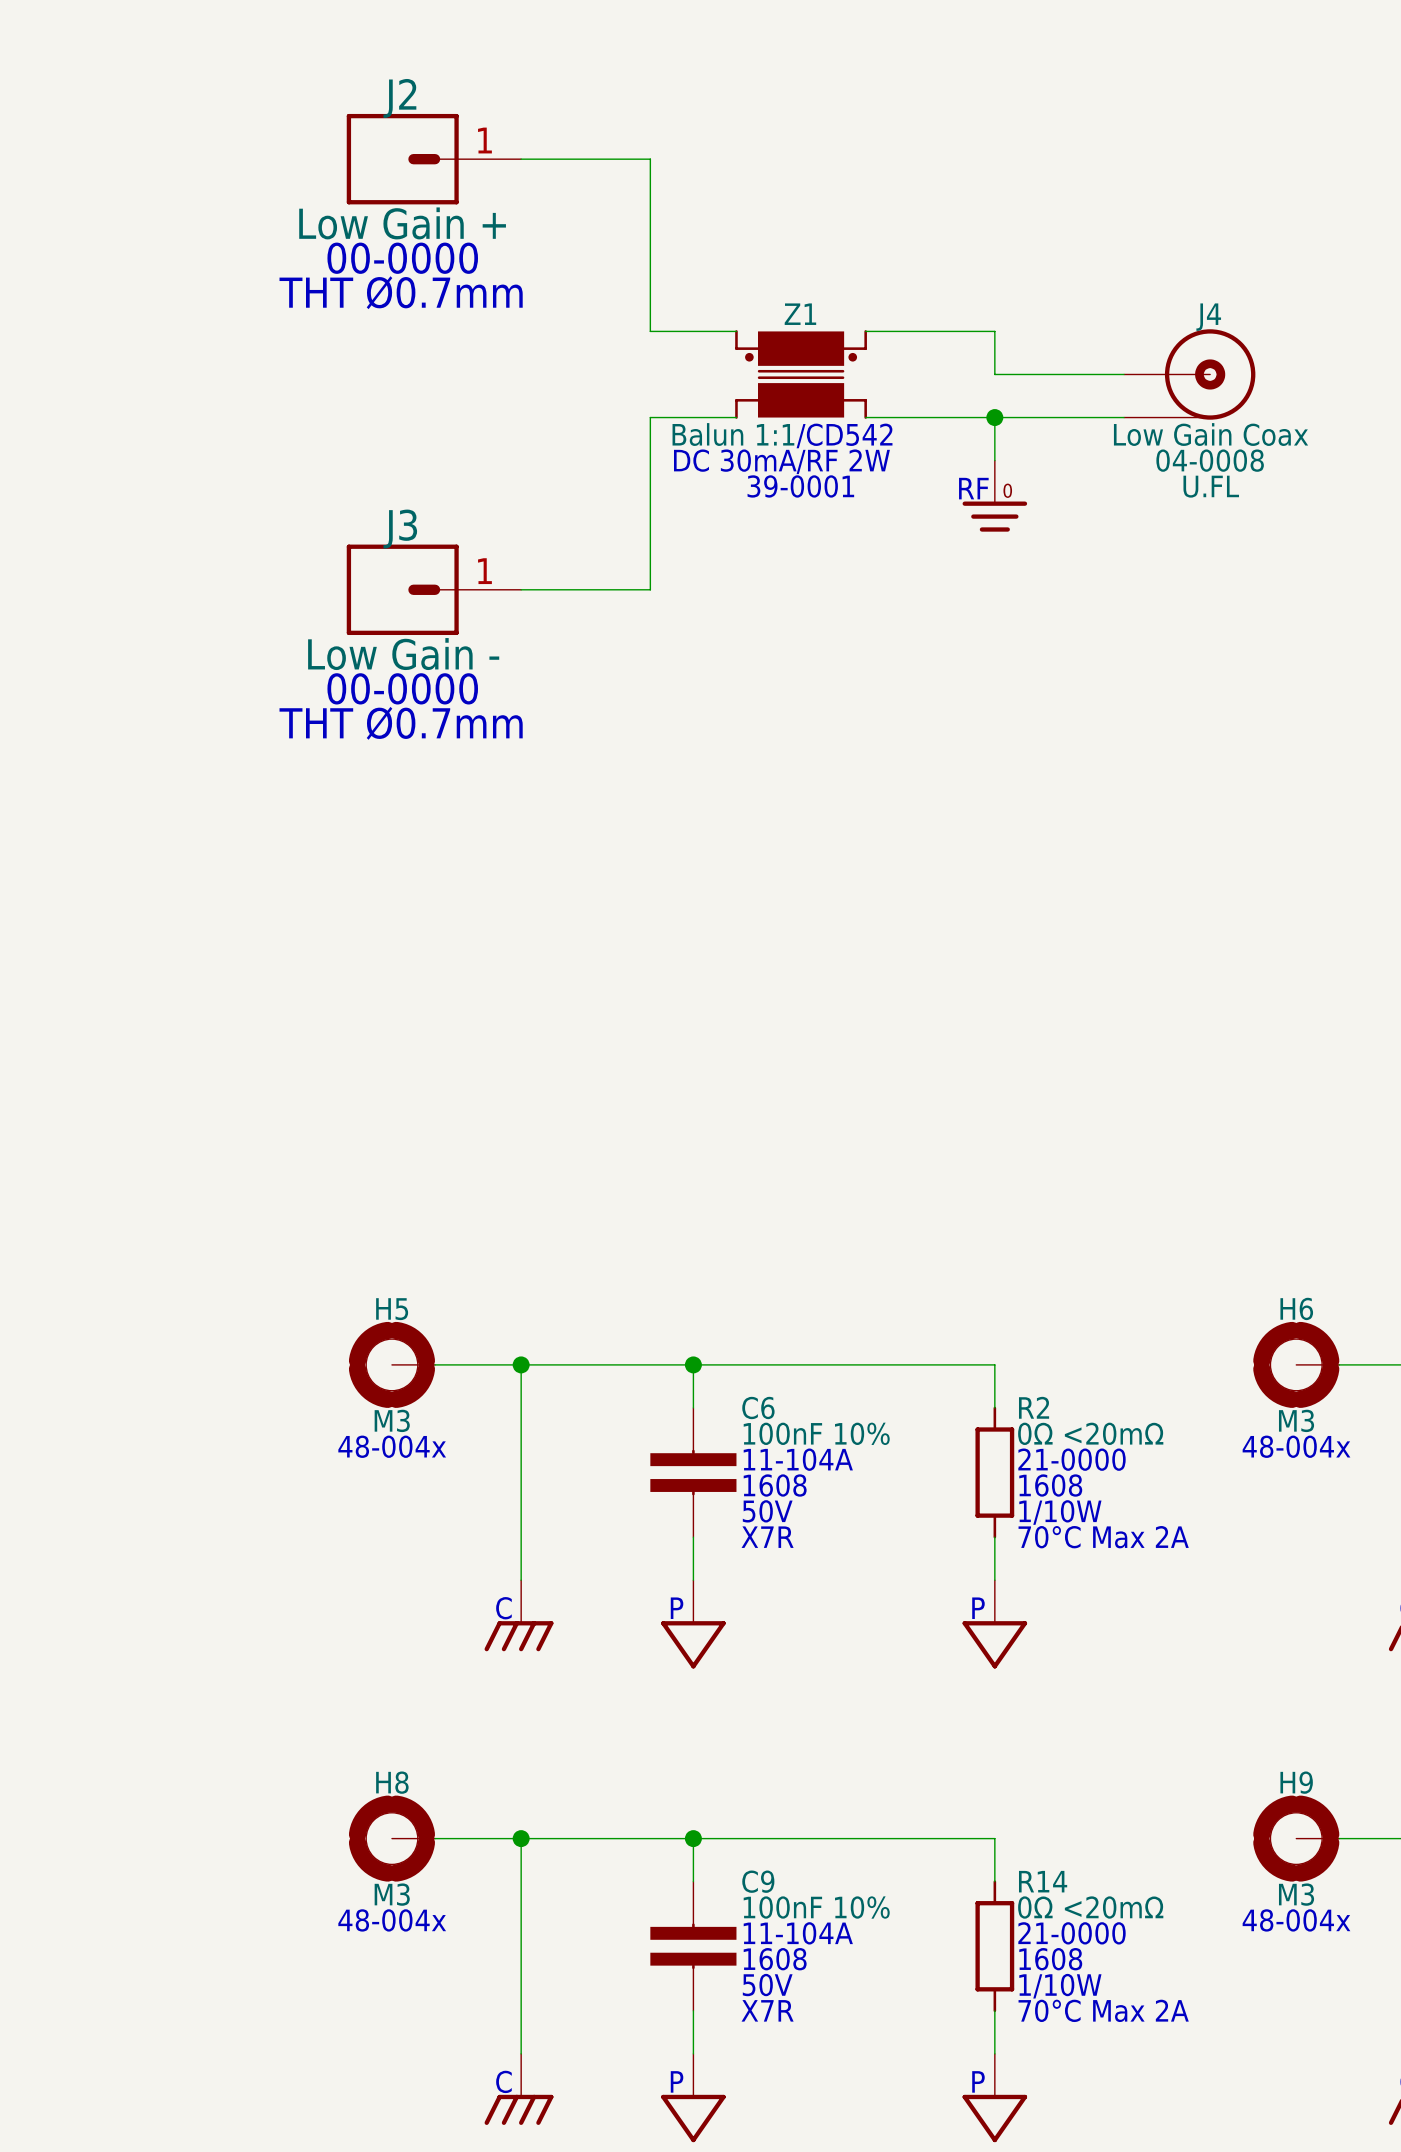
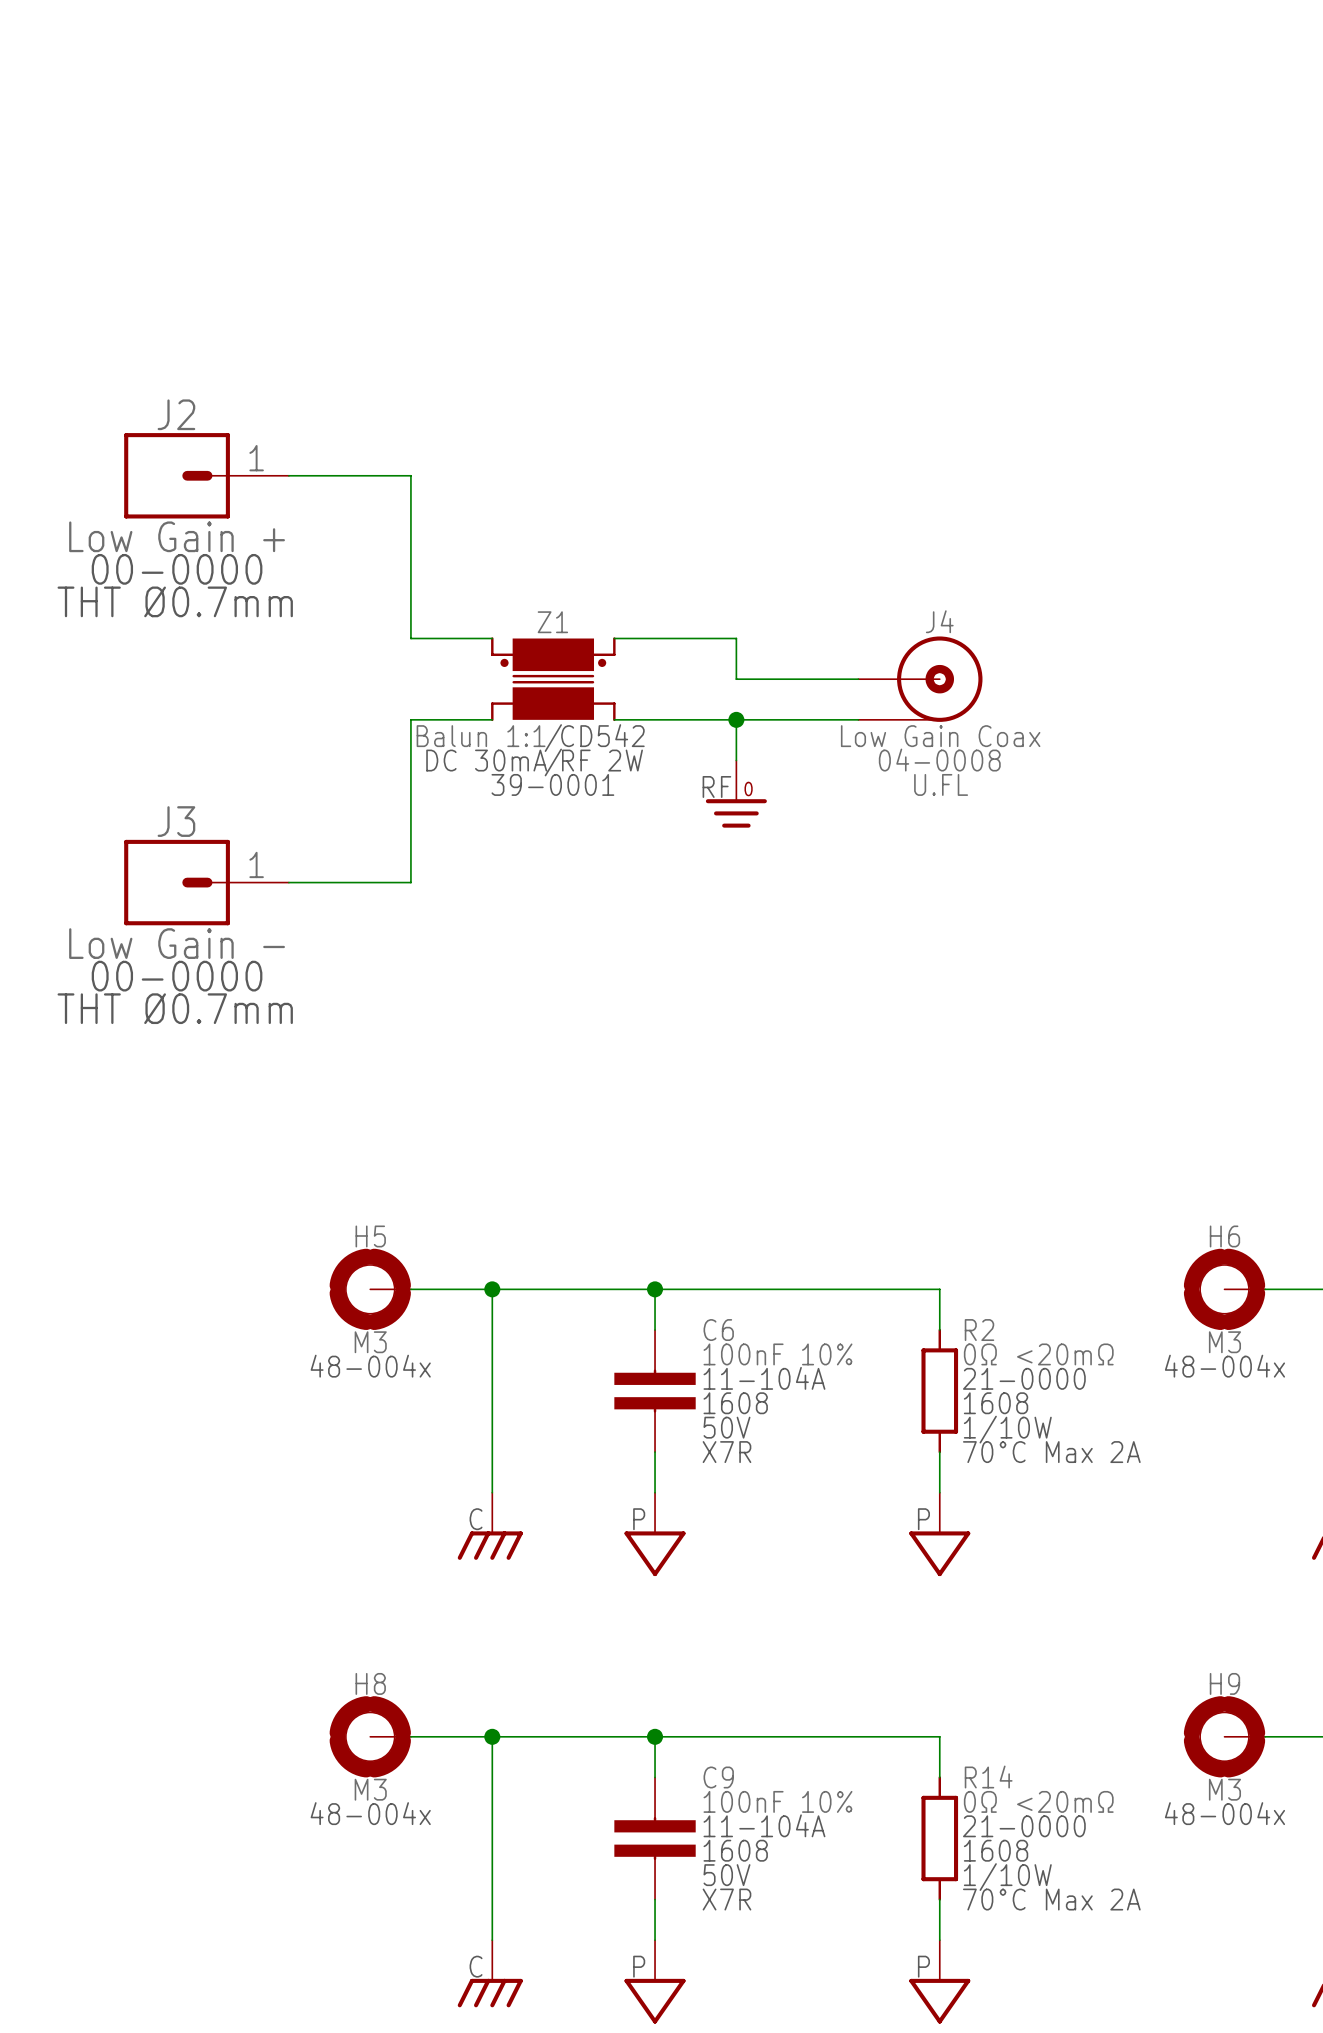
J2 position: (433, 159) -> (206, 475)
wire: (521, 159) (650, 159) (650, 331) (736, 331) -> (288, 475) (410, 475) (410, 638) (492, 638)
wire: (865, 331) (994, 331) (994, 374) (1124, 374) -> (614, 638) (736, 638) (736, 679) (858, 679)
Z1 position: (801, 374) -> (553, 679)
J4 position: (1189, 374) -> (920, 679)
wire: (736, 417) (650, 417) (650, 589) (521, 589) -> (492, 719) (410, 719) (410, 882) (288, 882)
wire: (865, 417) (1124, 417) -> (614, 719) (858, 719)
wire: (994, 417) (994, 460) -> (736, 719) (736, 760)
junction: (994, 417) -> none
power symbol position: (994, 496) -> (736, 794)
J3 position: (433, 589) -> (206, 882)
junction: none -> (736, 719)

